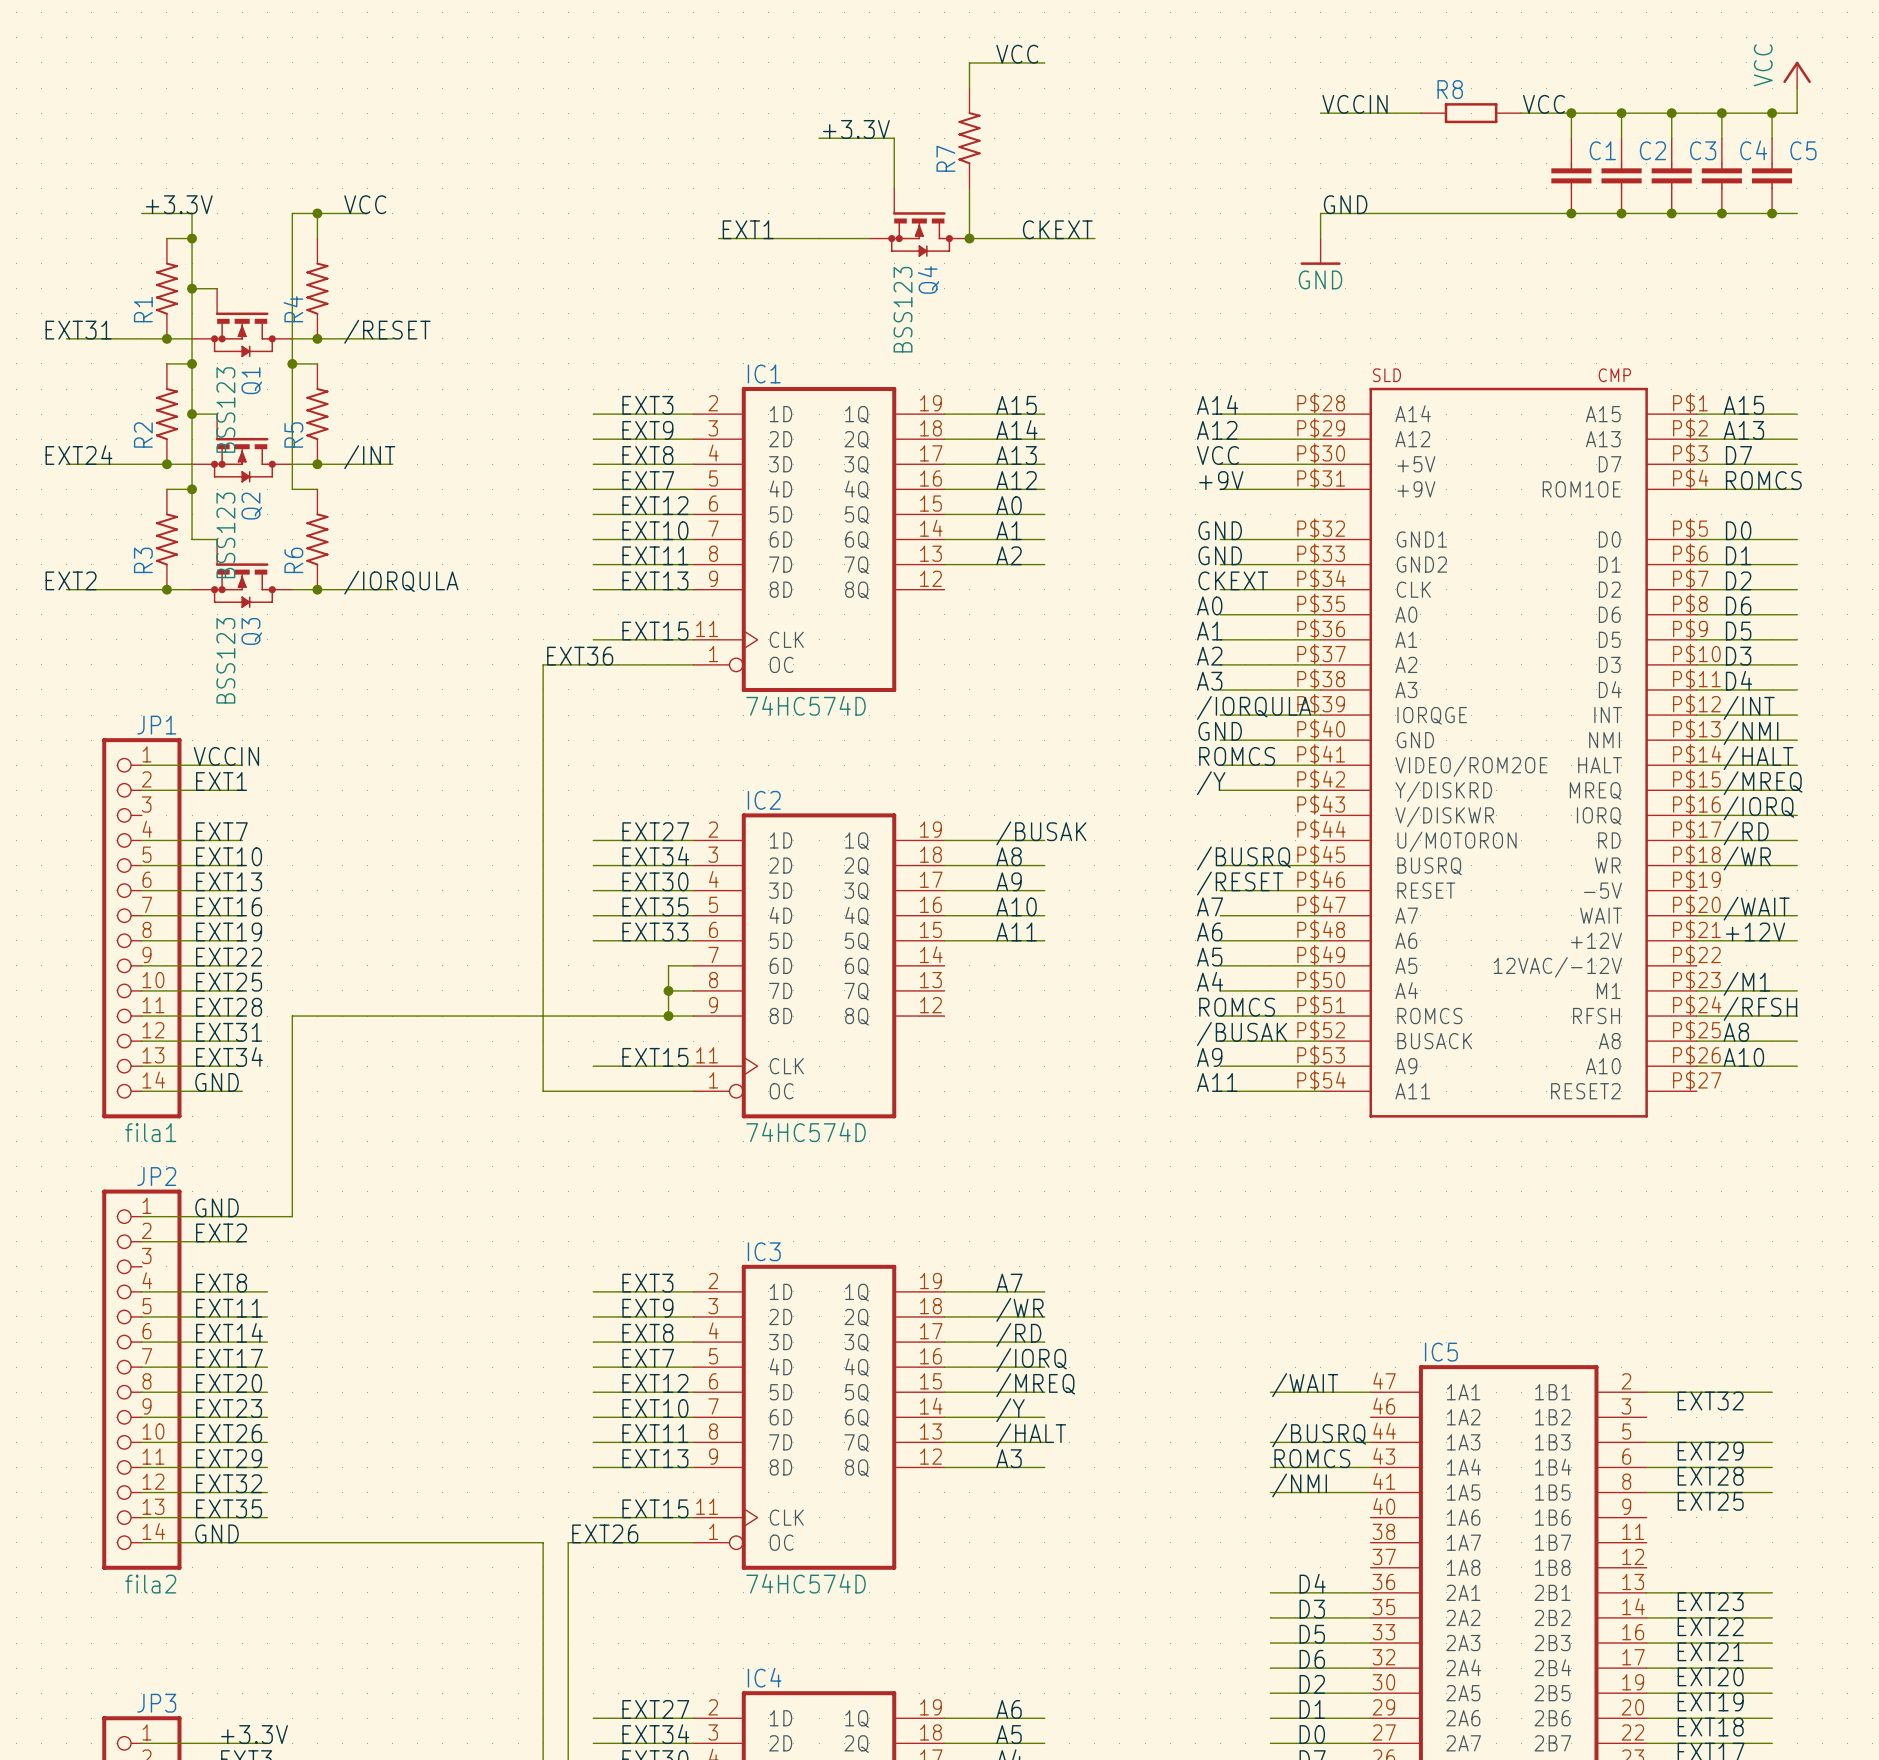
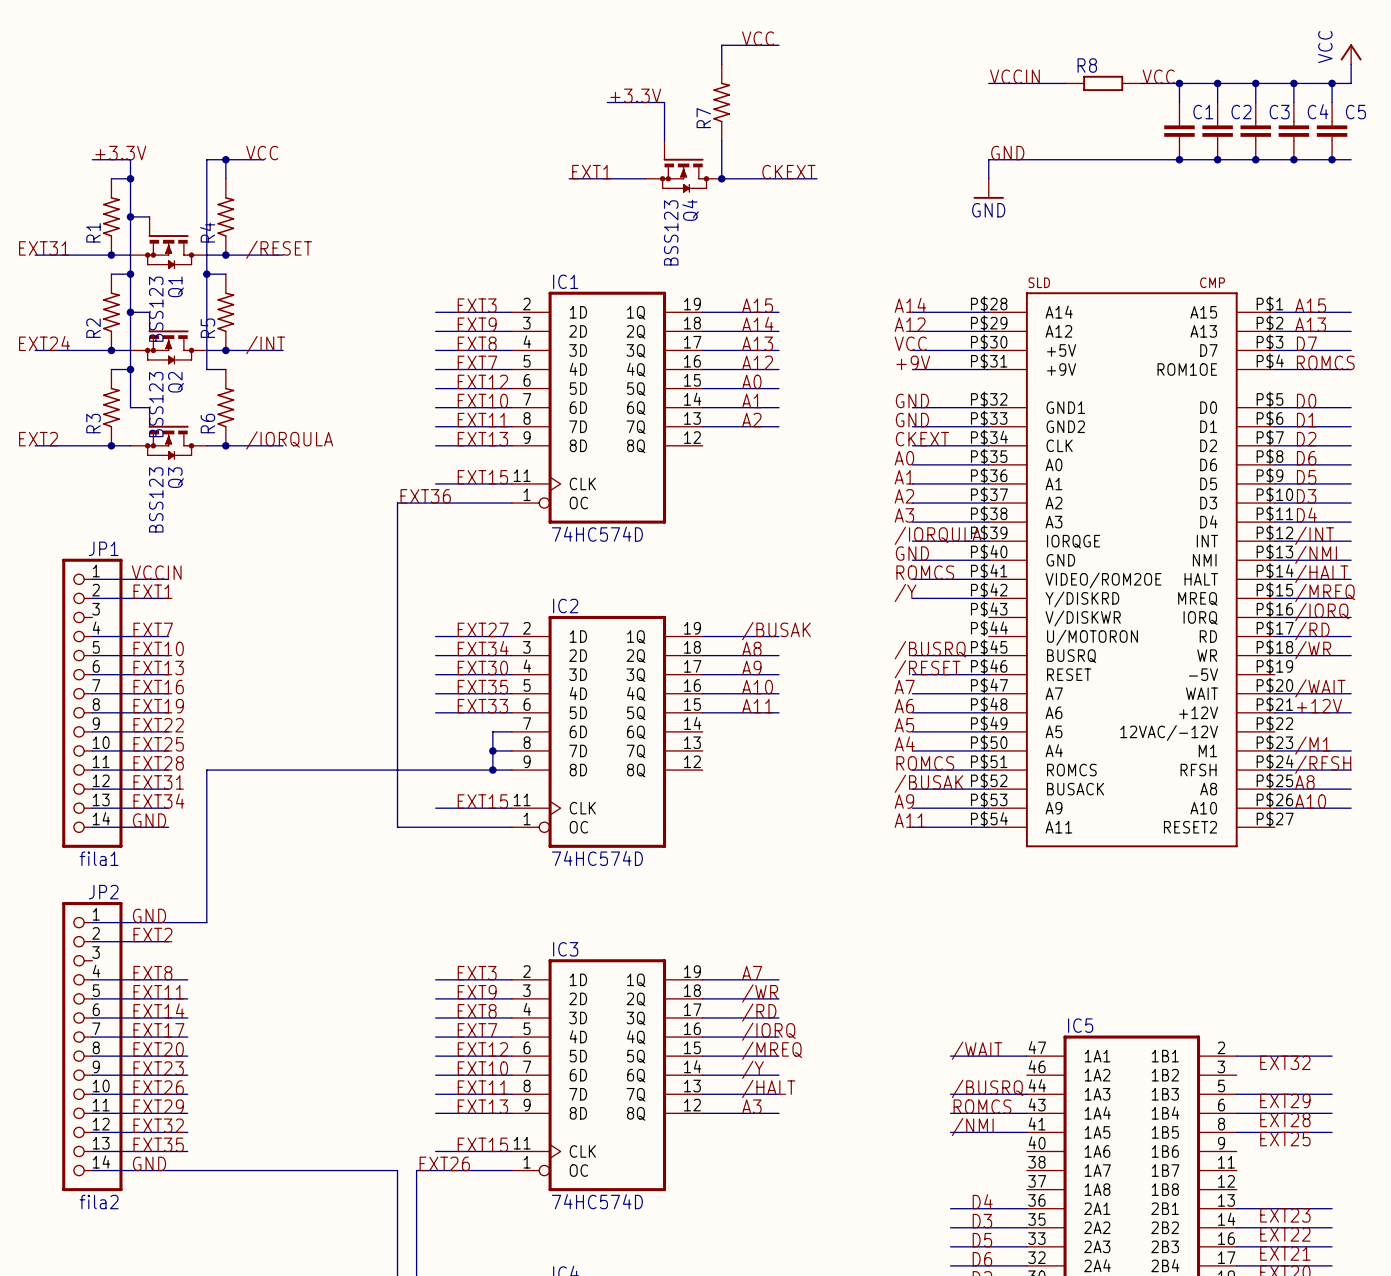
label position: EXT1 (748, 229) -> EXT1 (591, 172)
wire: (718, 238) (768, 238) -> none

